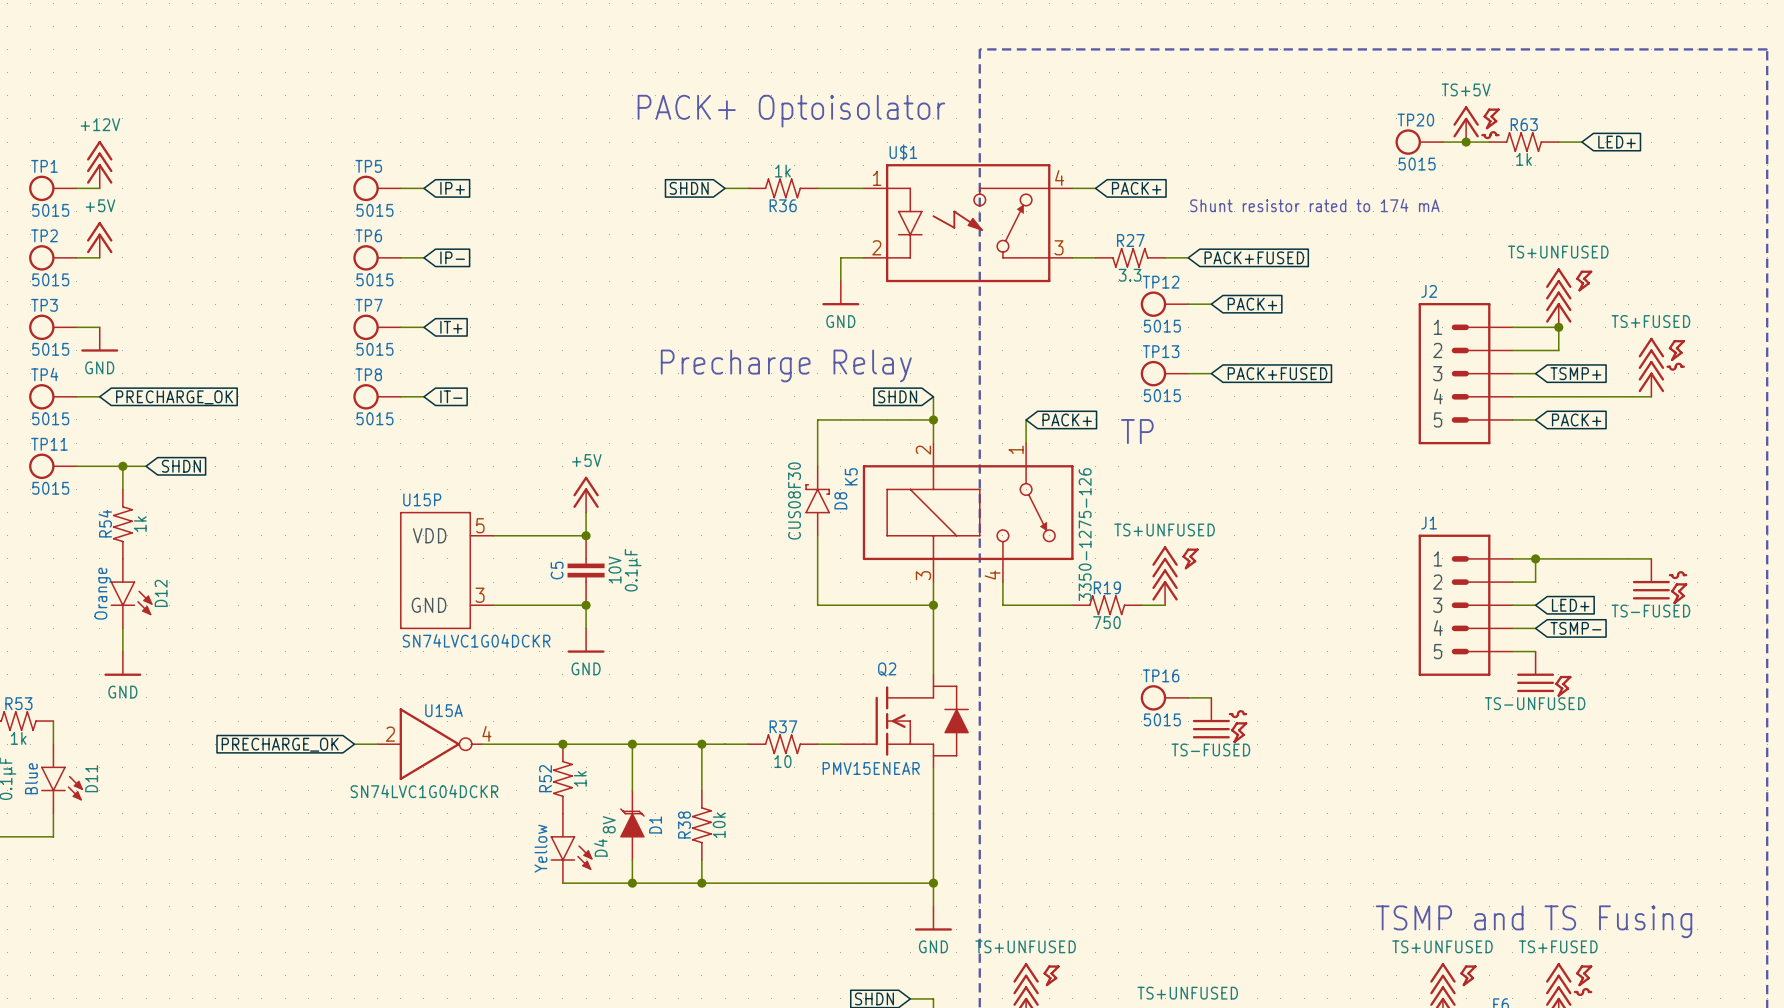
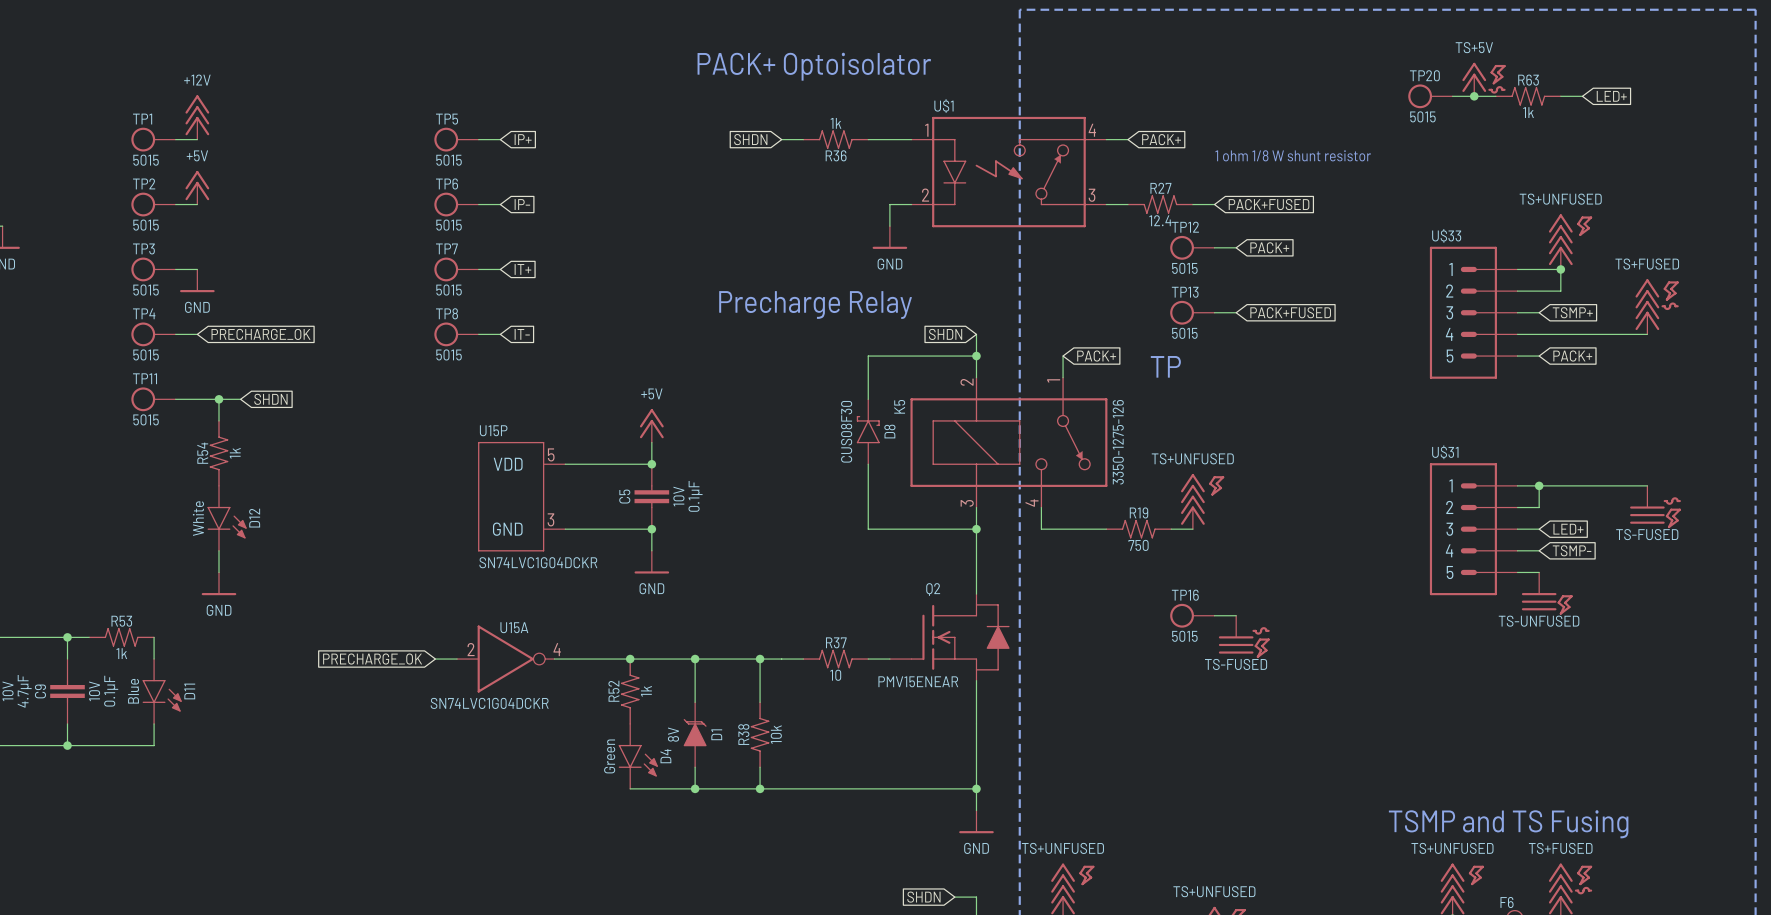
text: Shunt resistor rated to 174 mA (1314, 205) -> 1 ohm 1/8 W shunt resistor (1293, 155)
R27 text: 3.3 (1130, 275) -> 12.4 (1160, 220)
J2 name: J2 (1429, 291) -> U$33 (1446, 235)
J1 name: J1 (1429, 523) -> U$31 (1445, 452)
D12 text: Orange (102, 593) -> White (198, 518)
D4 text: Yellow (540, 848) -> Green (609, 756)

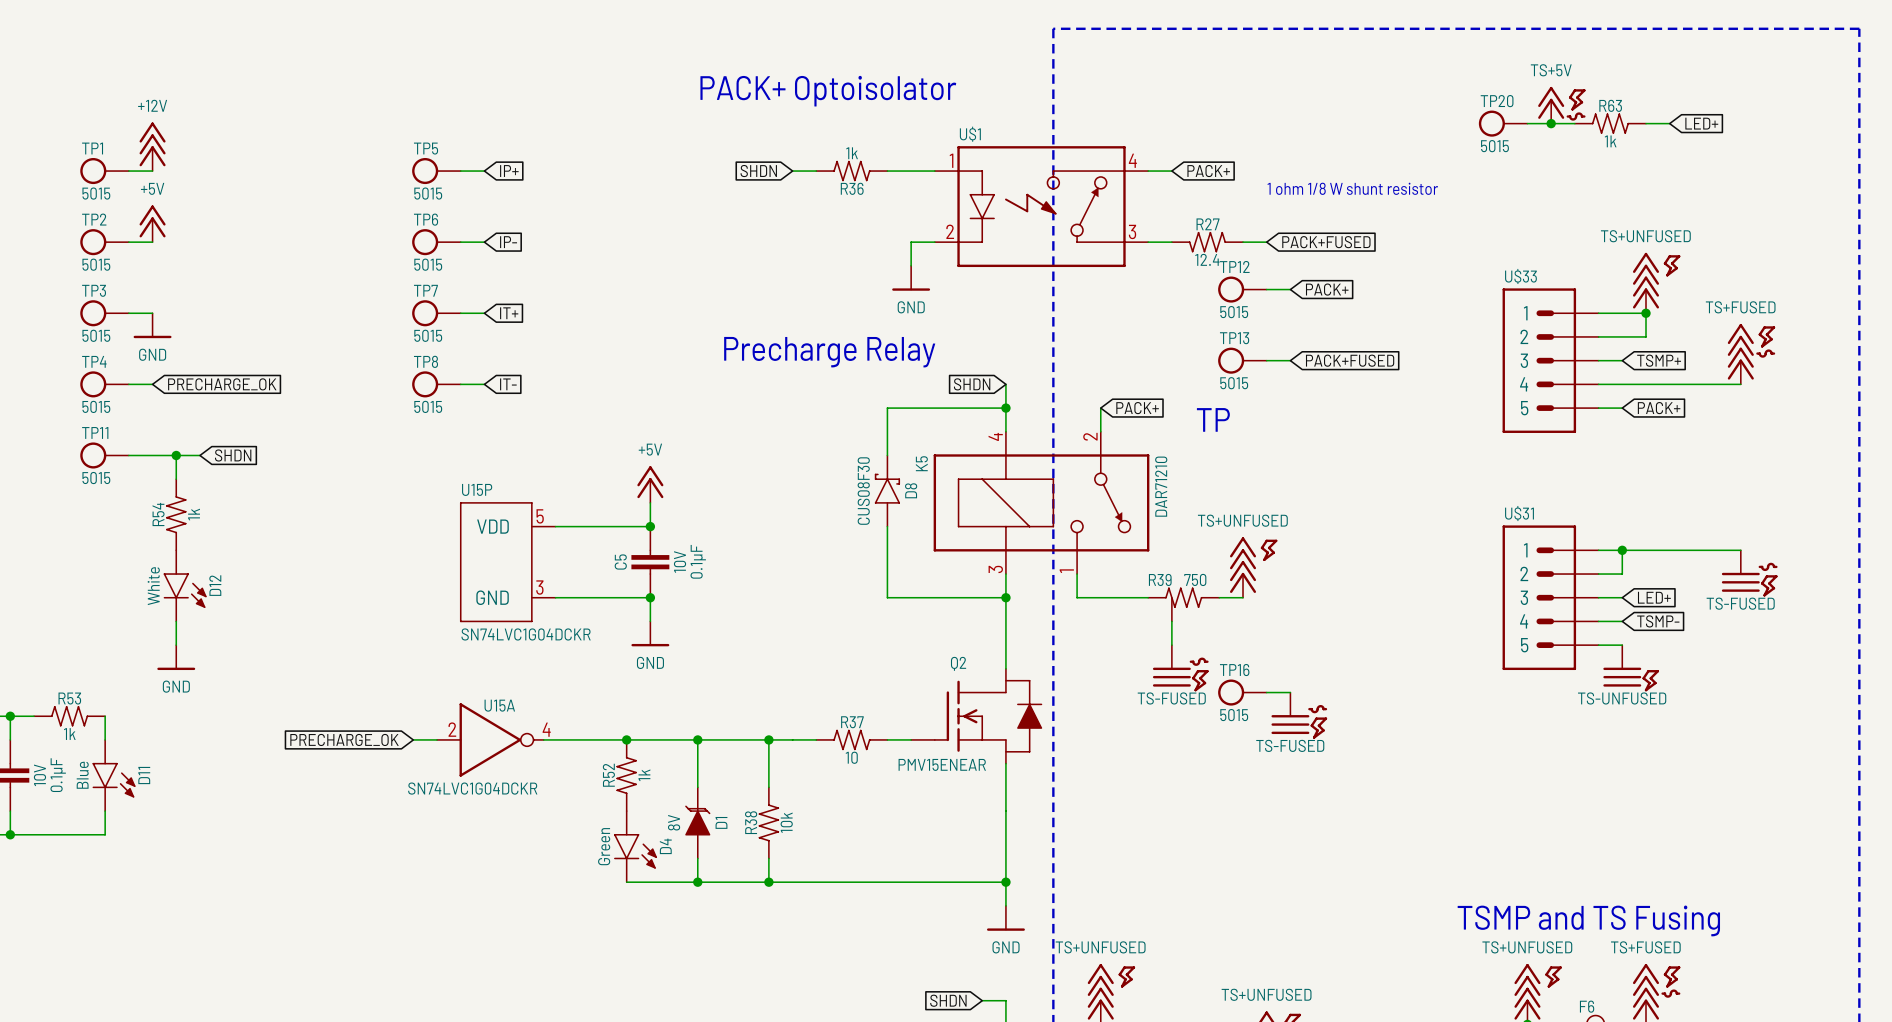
K5 pin number: 1 (1053, 380) -> 2 (1090, 436)
K5 pin number: 2 (967, 382) -> 4 (995, 436)
K5 text: 3350-1275-126 (1118, 442) -> DAR71210 (1161, 486)
K5 pin number: 4 (1032, 503) -> 1 (1066, 571)
R19: (1138, 529) -> none
R39: none -> (1183, 604)
wire: none -> (1171, 621) (1171, 645)
power symbol: none -> TS-FUSED (1180, 668)

